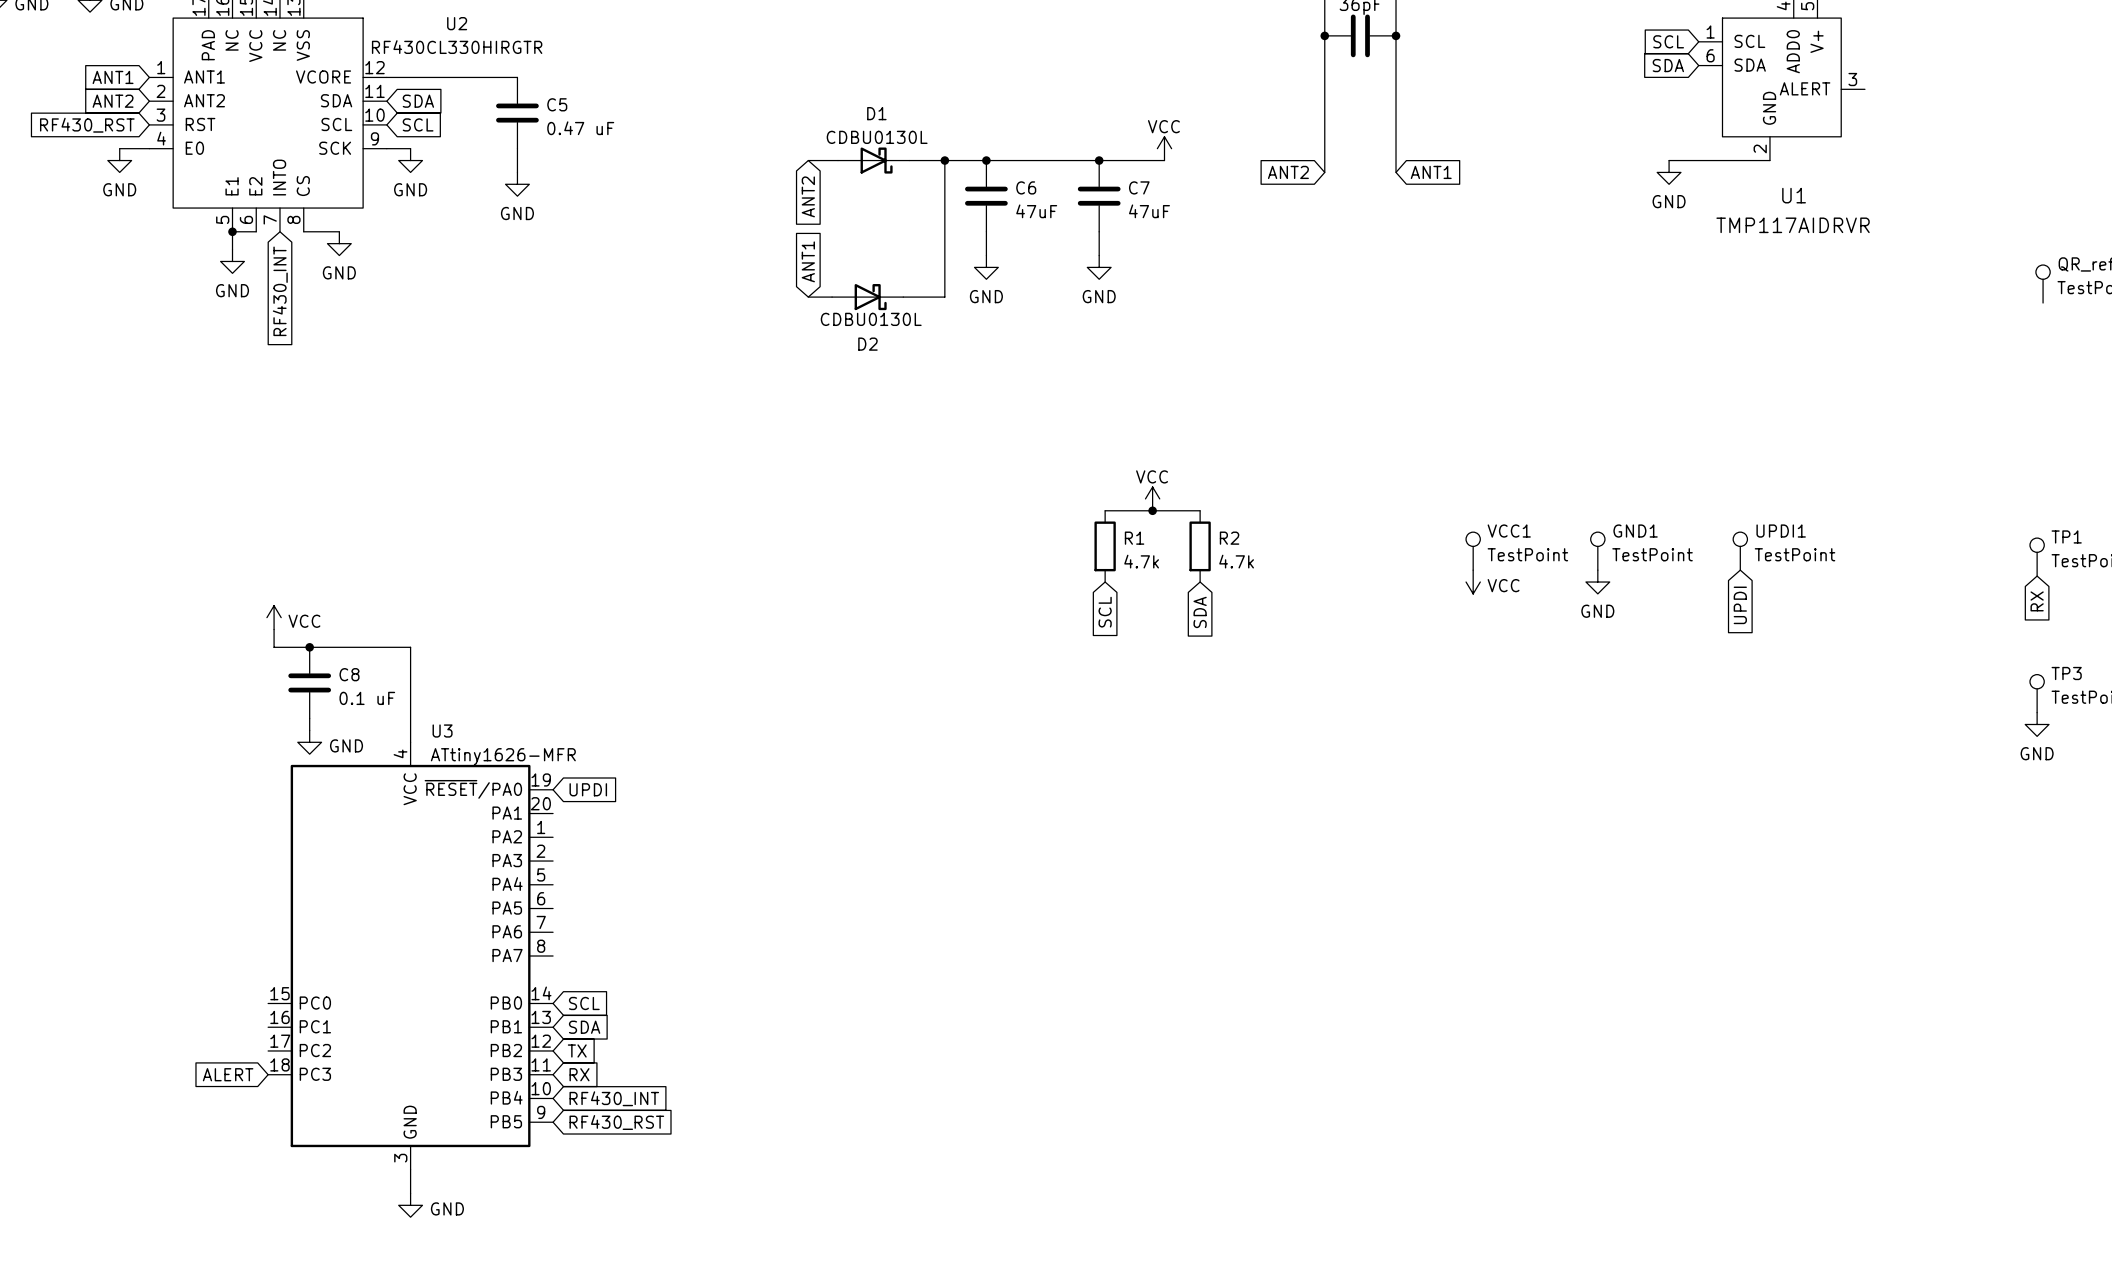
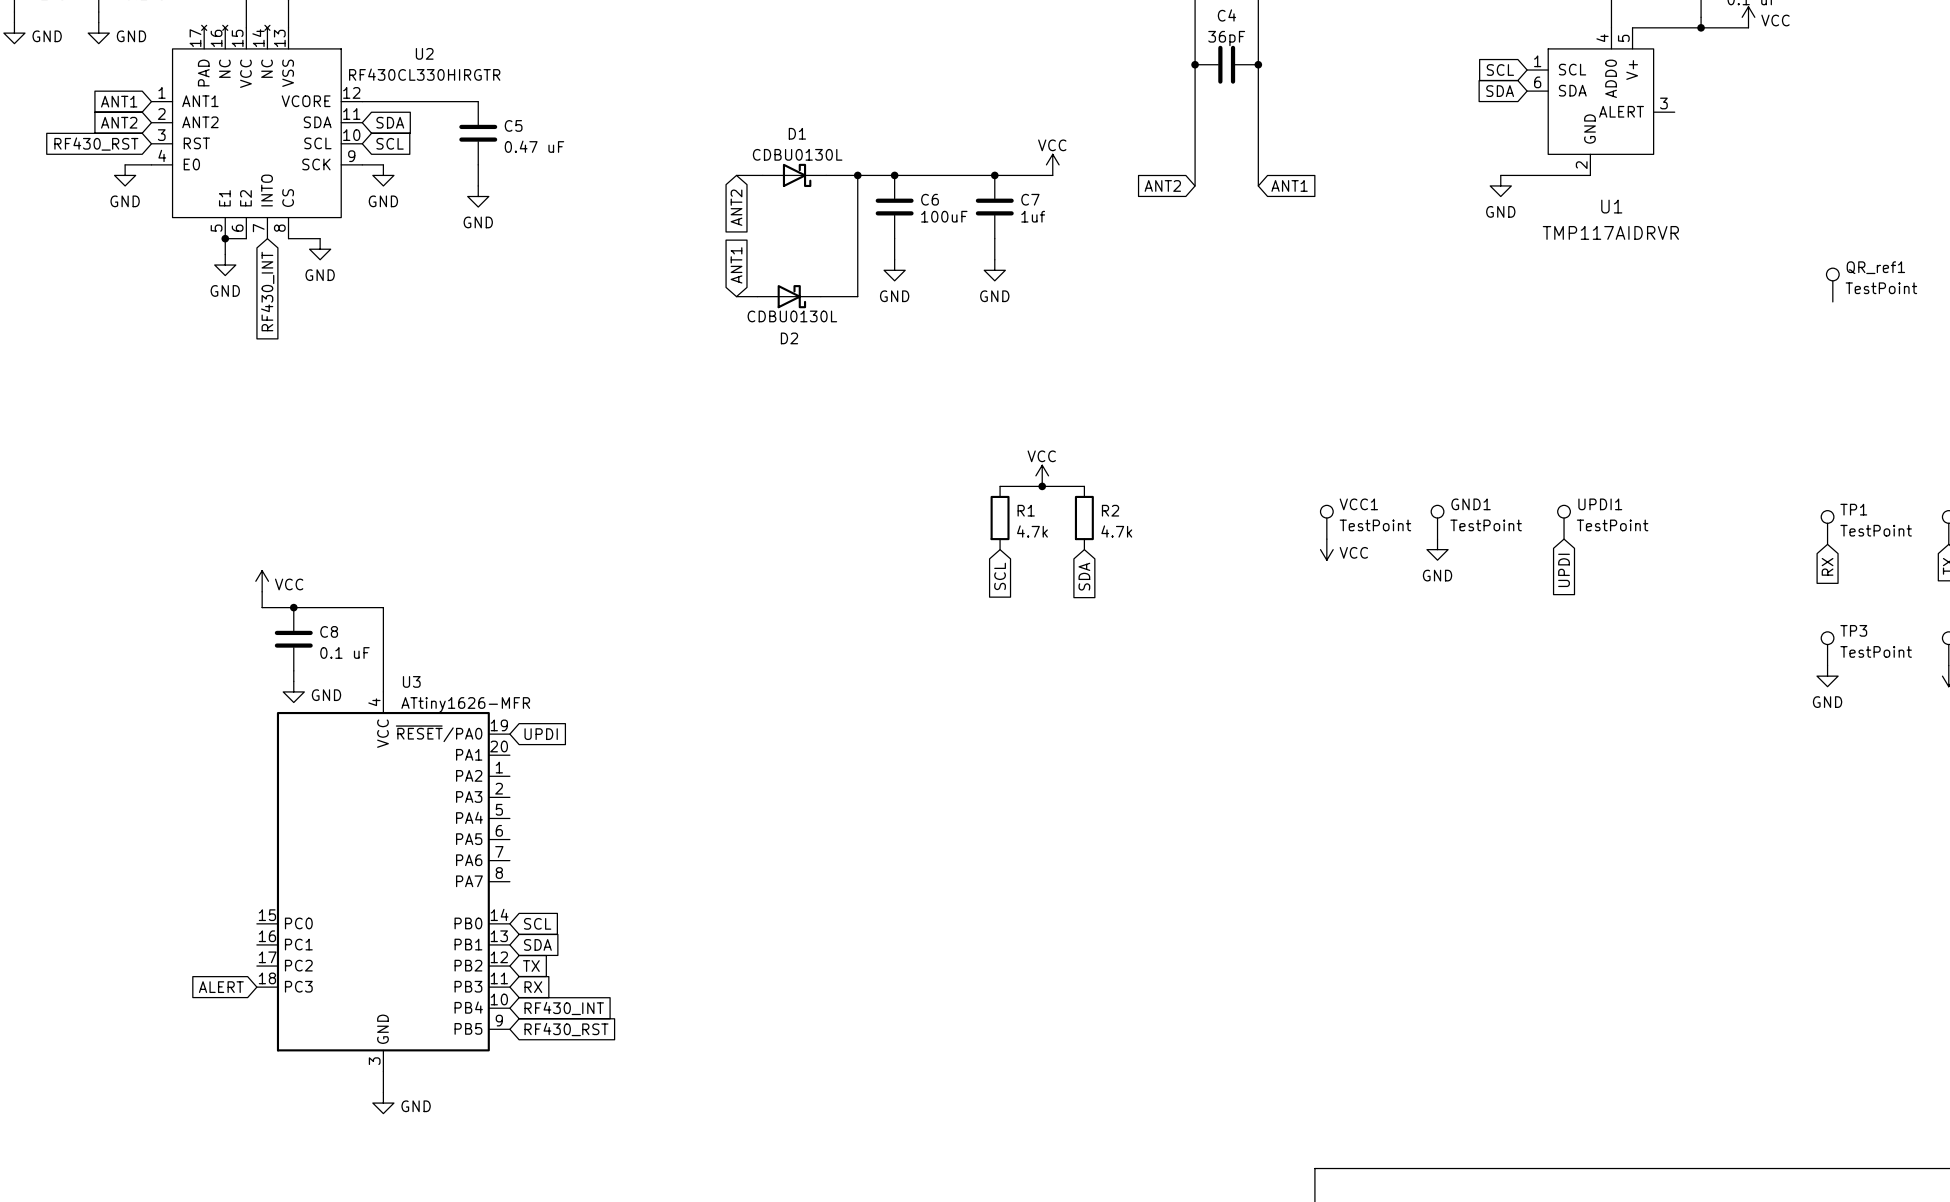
C6 value: 47uF (1036, 211) -> 100uF (944, 216)
C7 value: 47uF (1149, 211) -> 1uf (1033, 216)

